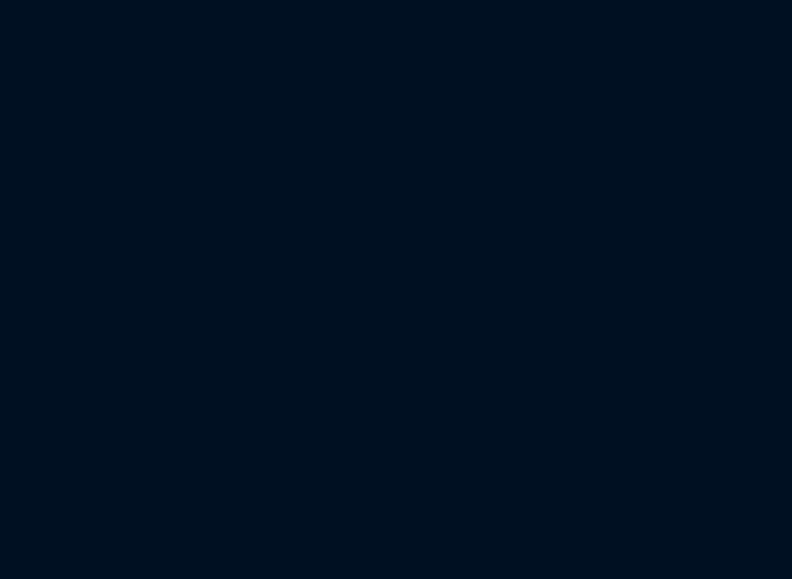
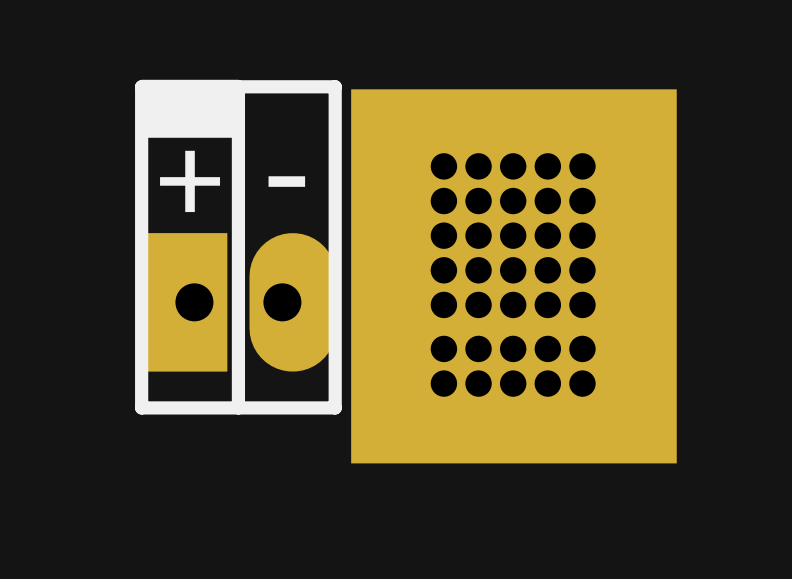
part: none -> (238, 247)
part: none -> (513, 276)

